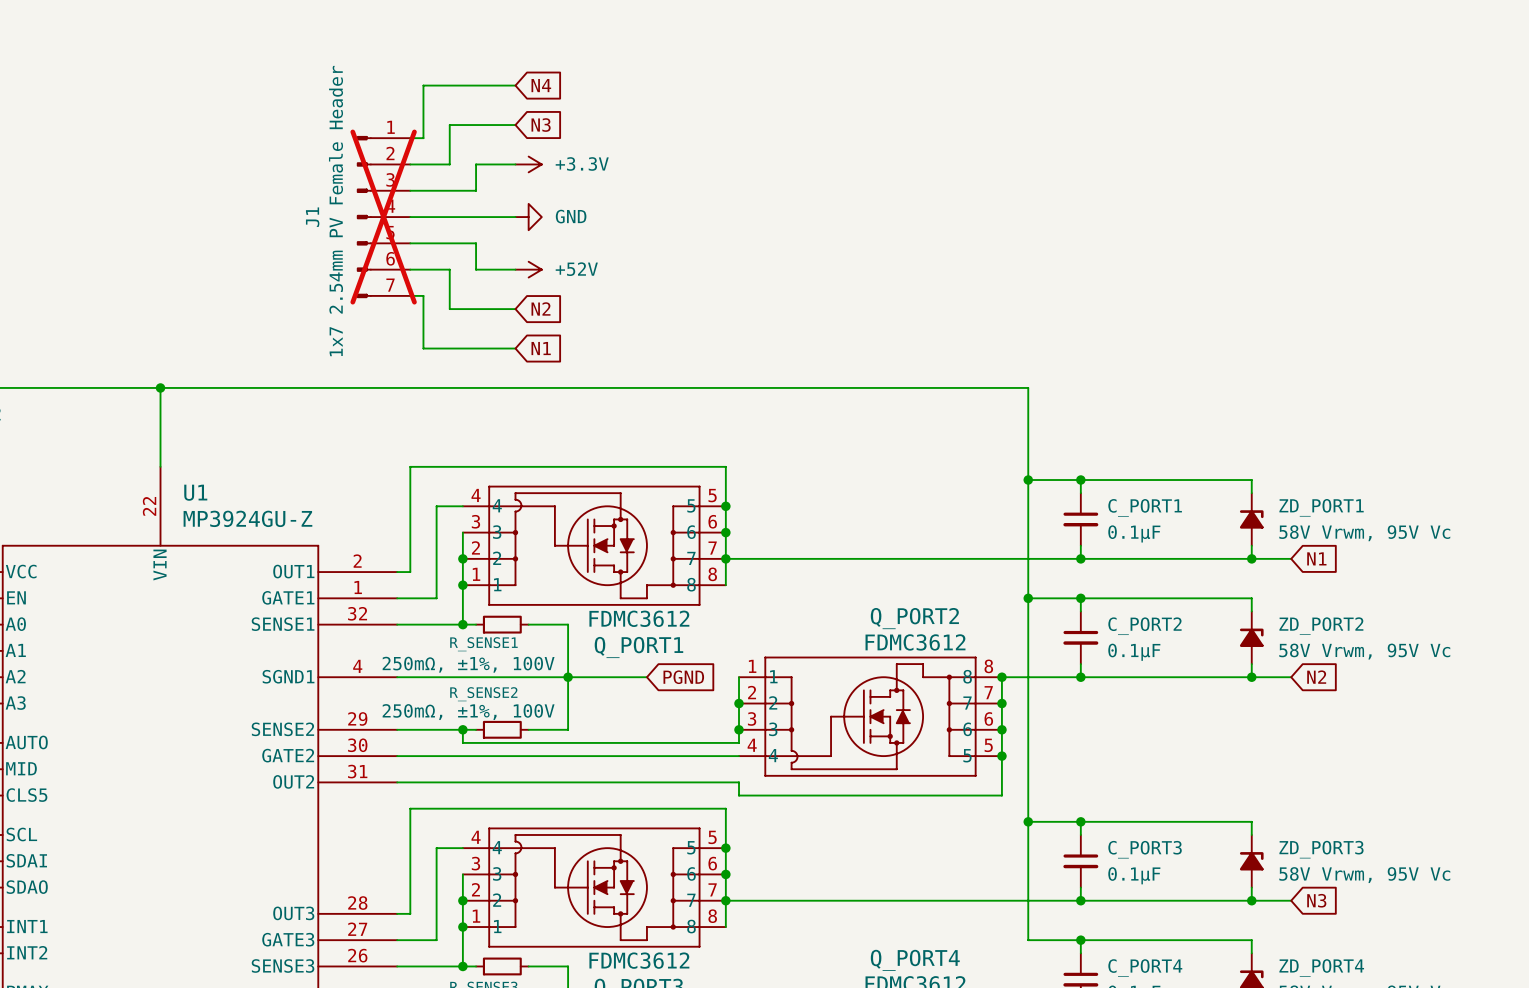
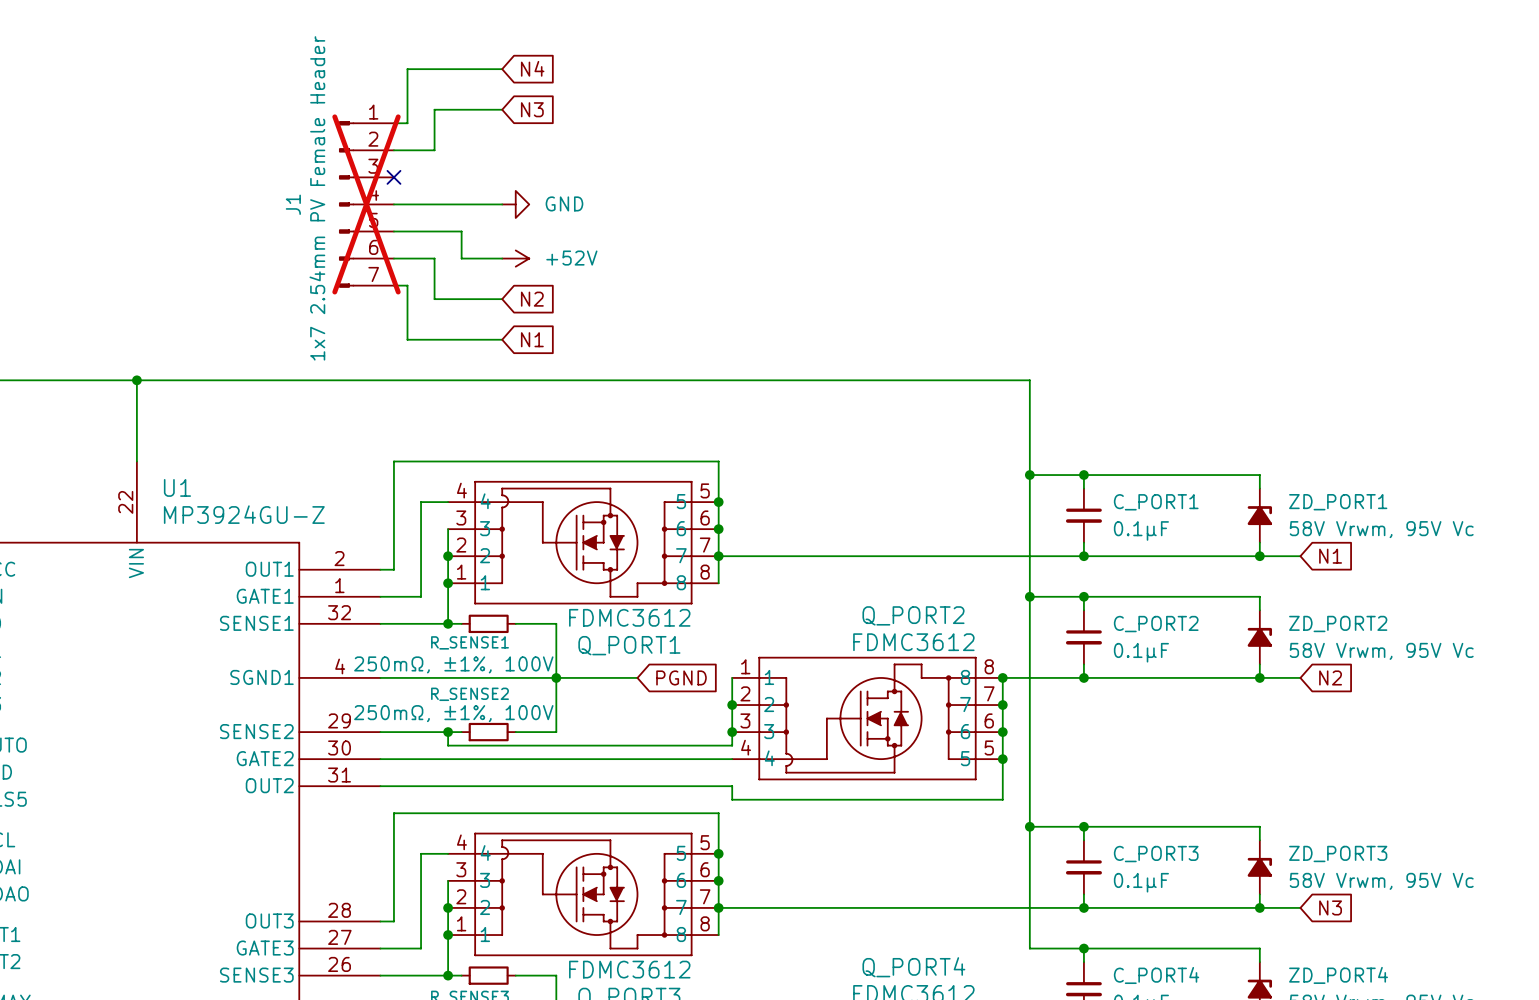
wire: (515, 164) (476, 164) (476, 190) (410, 190) -> none
power symbol: +3.3V (528, 164) -> none
no-connect mark: none -> (393, 177)

